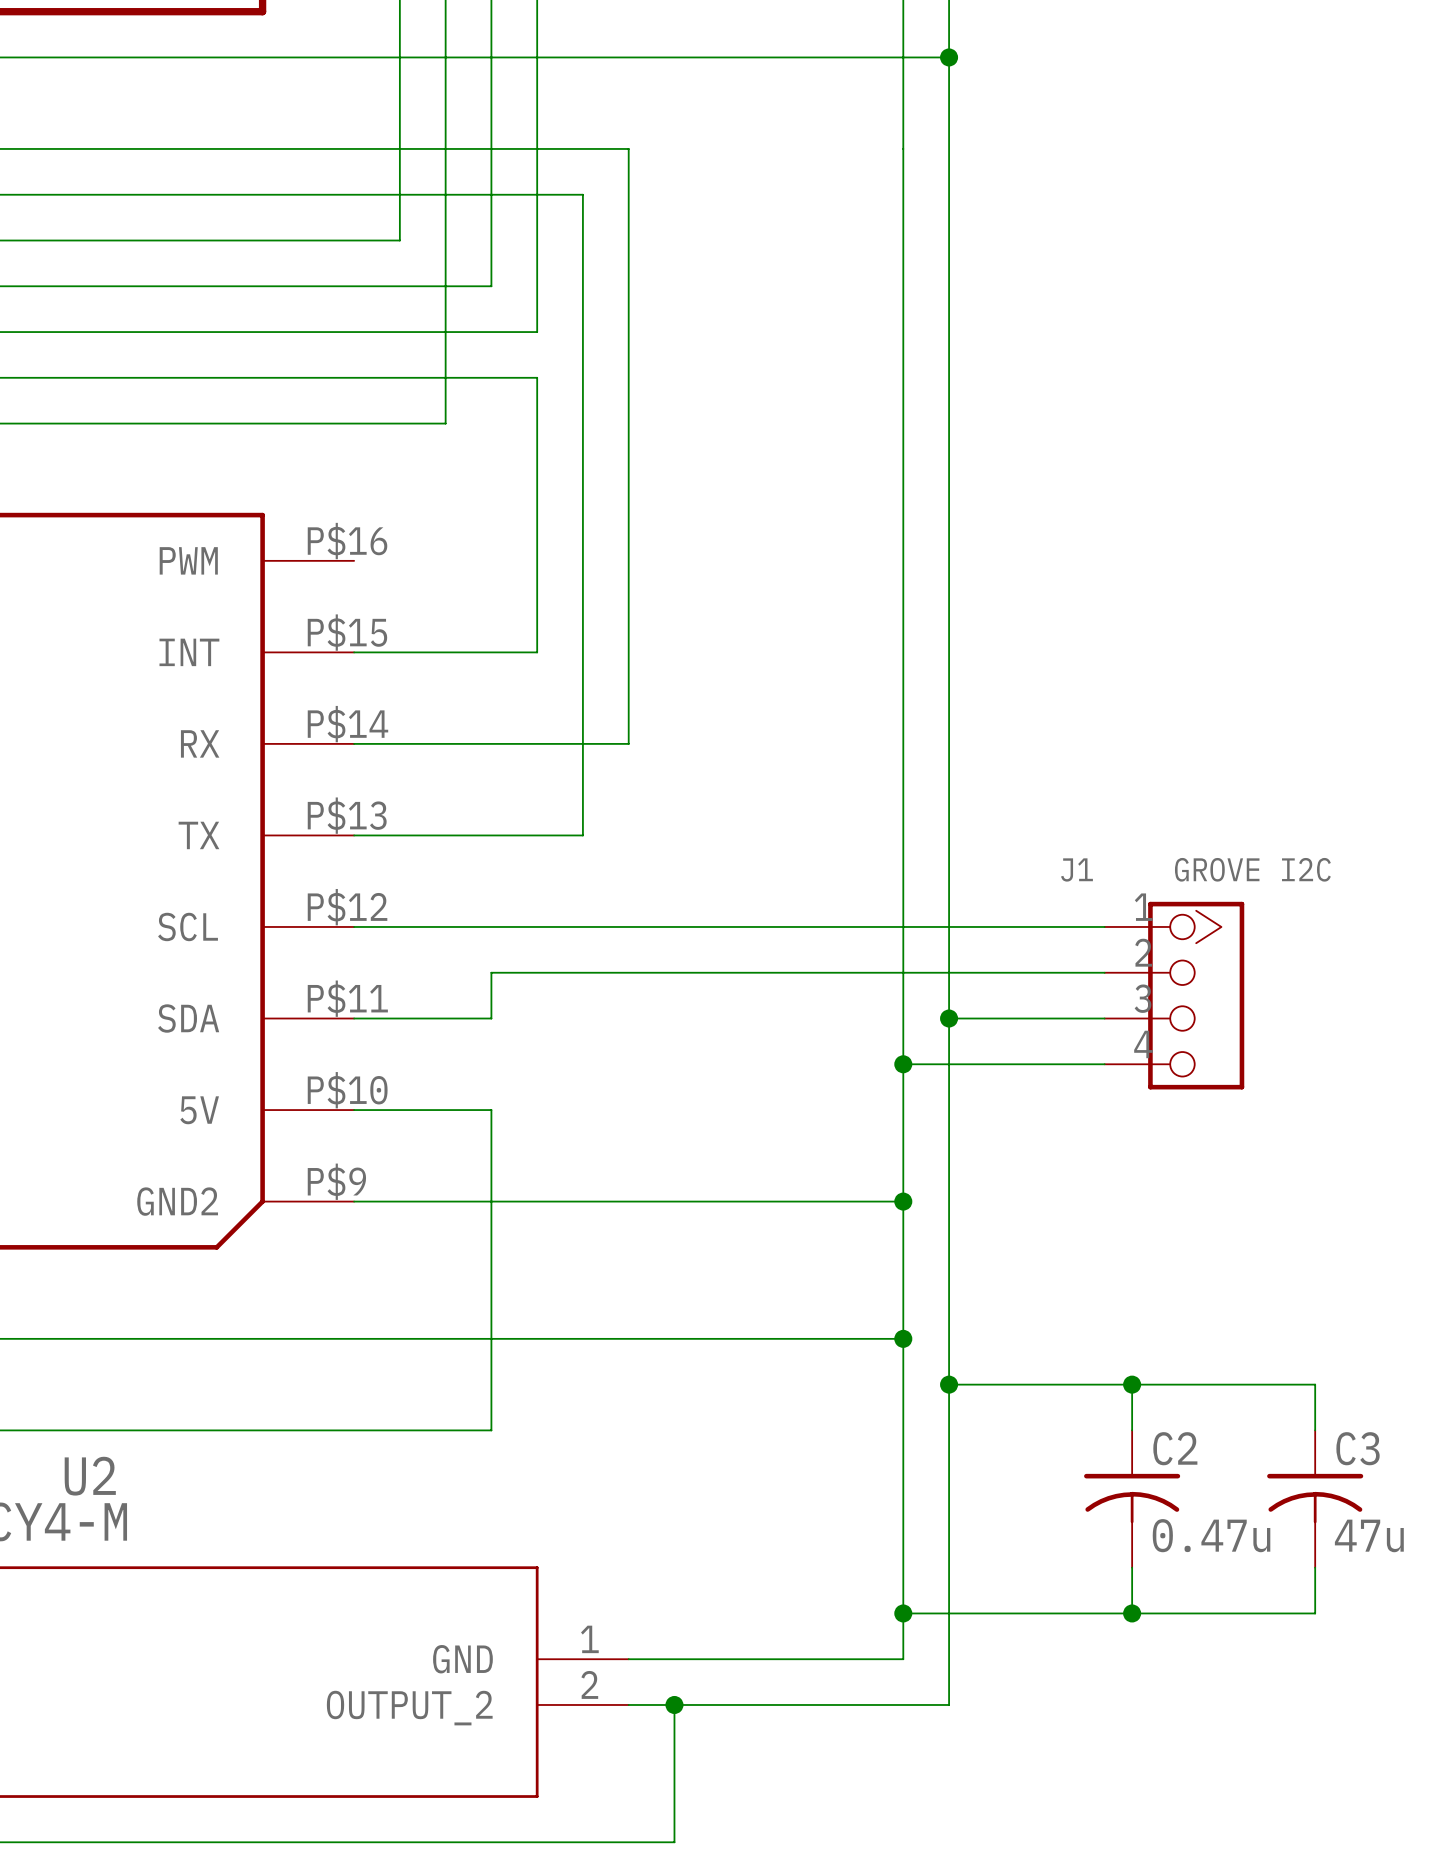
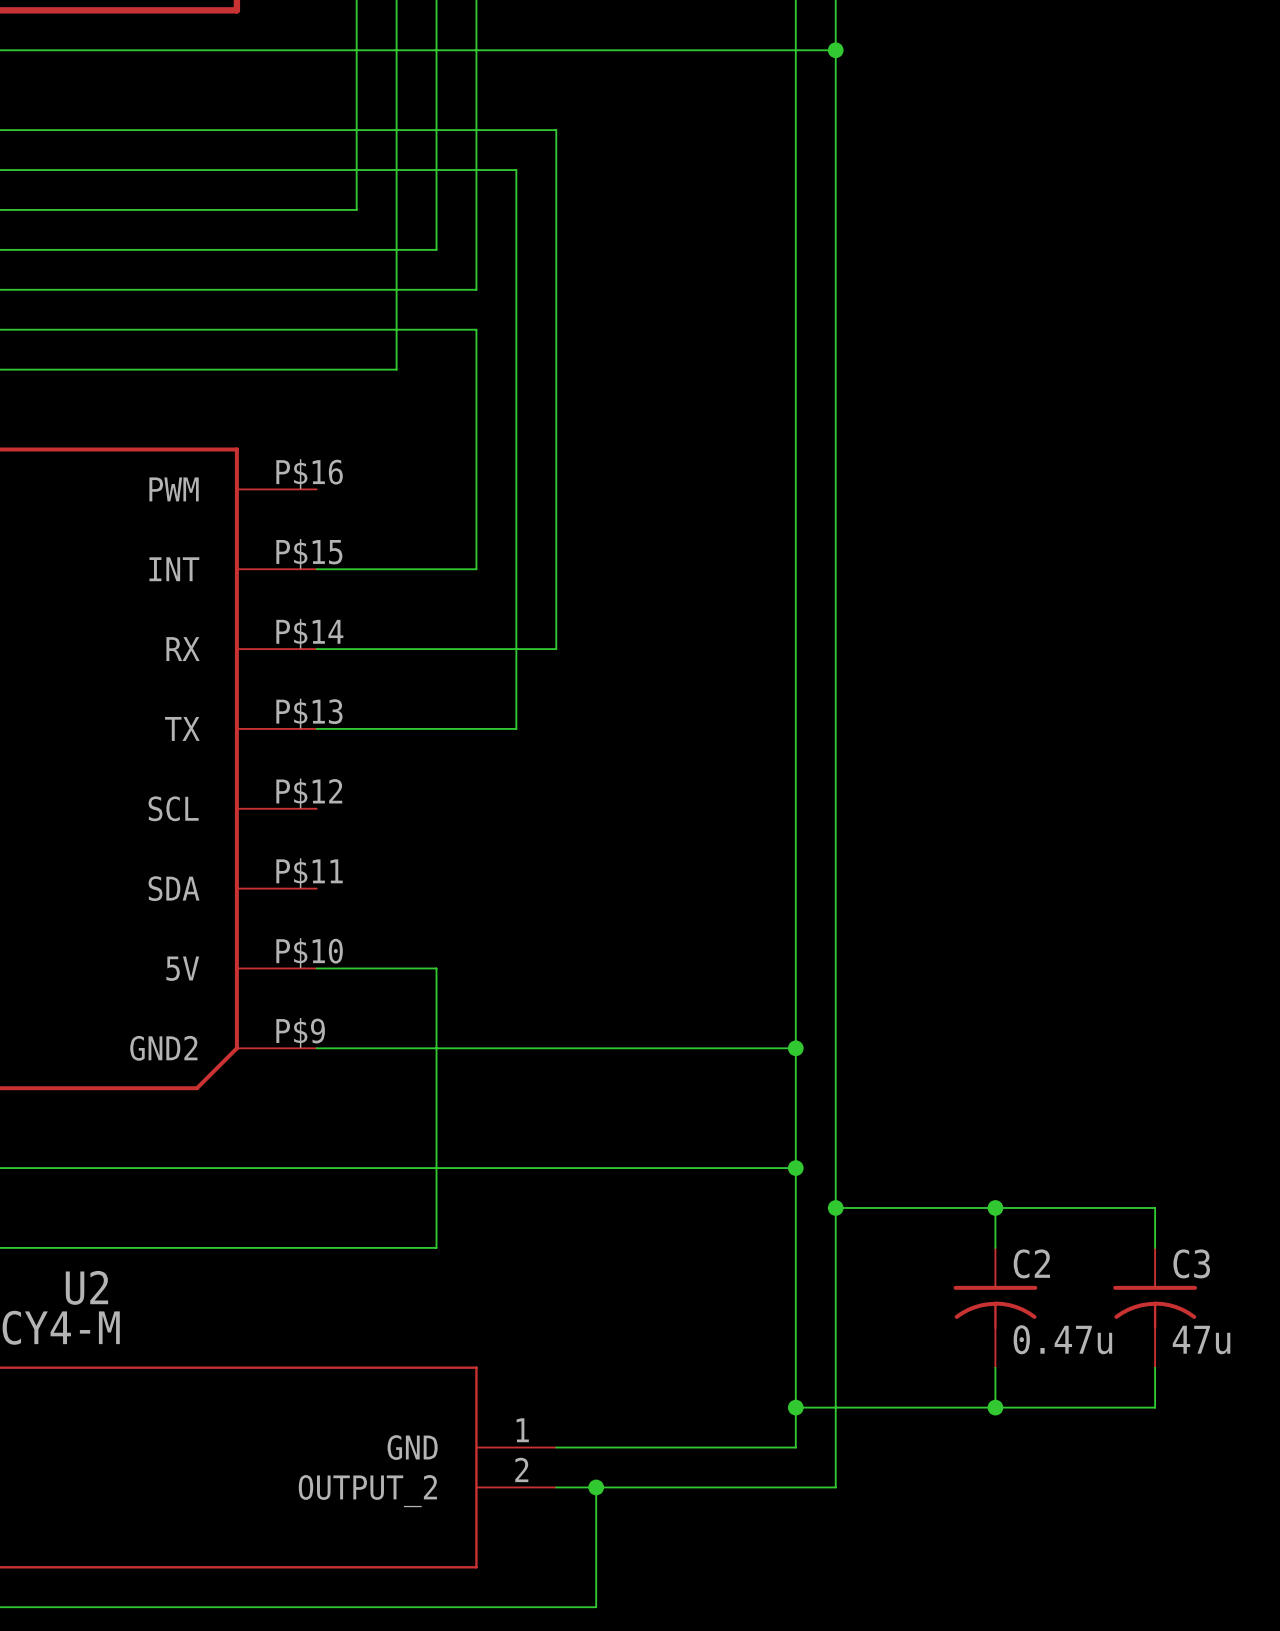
wire: (354, 926) (1104, 926) -> none
wire: (1104, 972) (491, 972) (491, 1018) (354, 1018) -> none
J1: GROVE I2C (1174, 995) -> none
wire: (949, 1018) (1104, 1018) -> none
junction: (949, 1018) -> none
wire: (903, 1064) (1104, 1064) -> none
junction: (903, 1064) -> none

